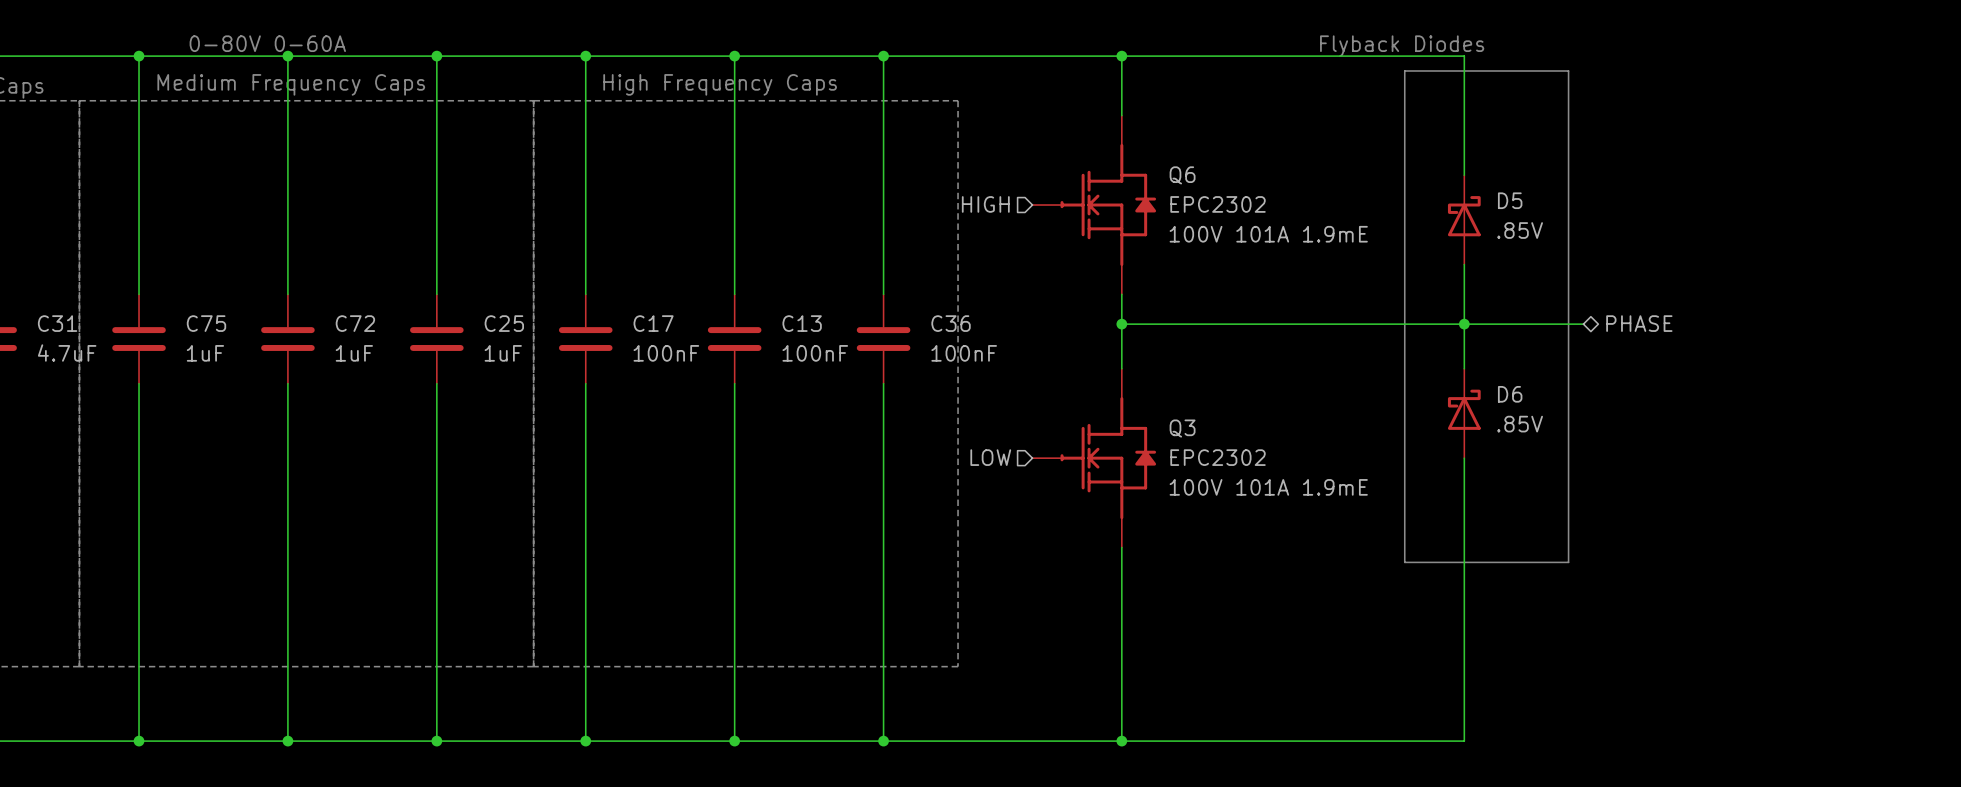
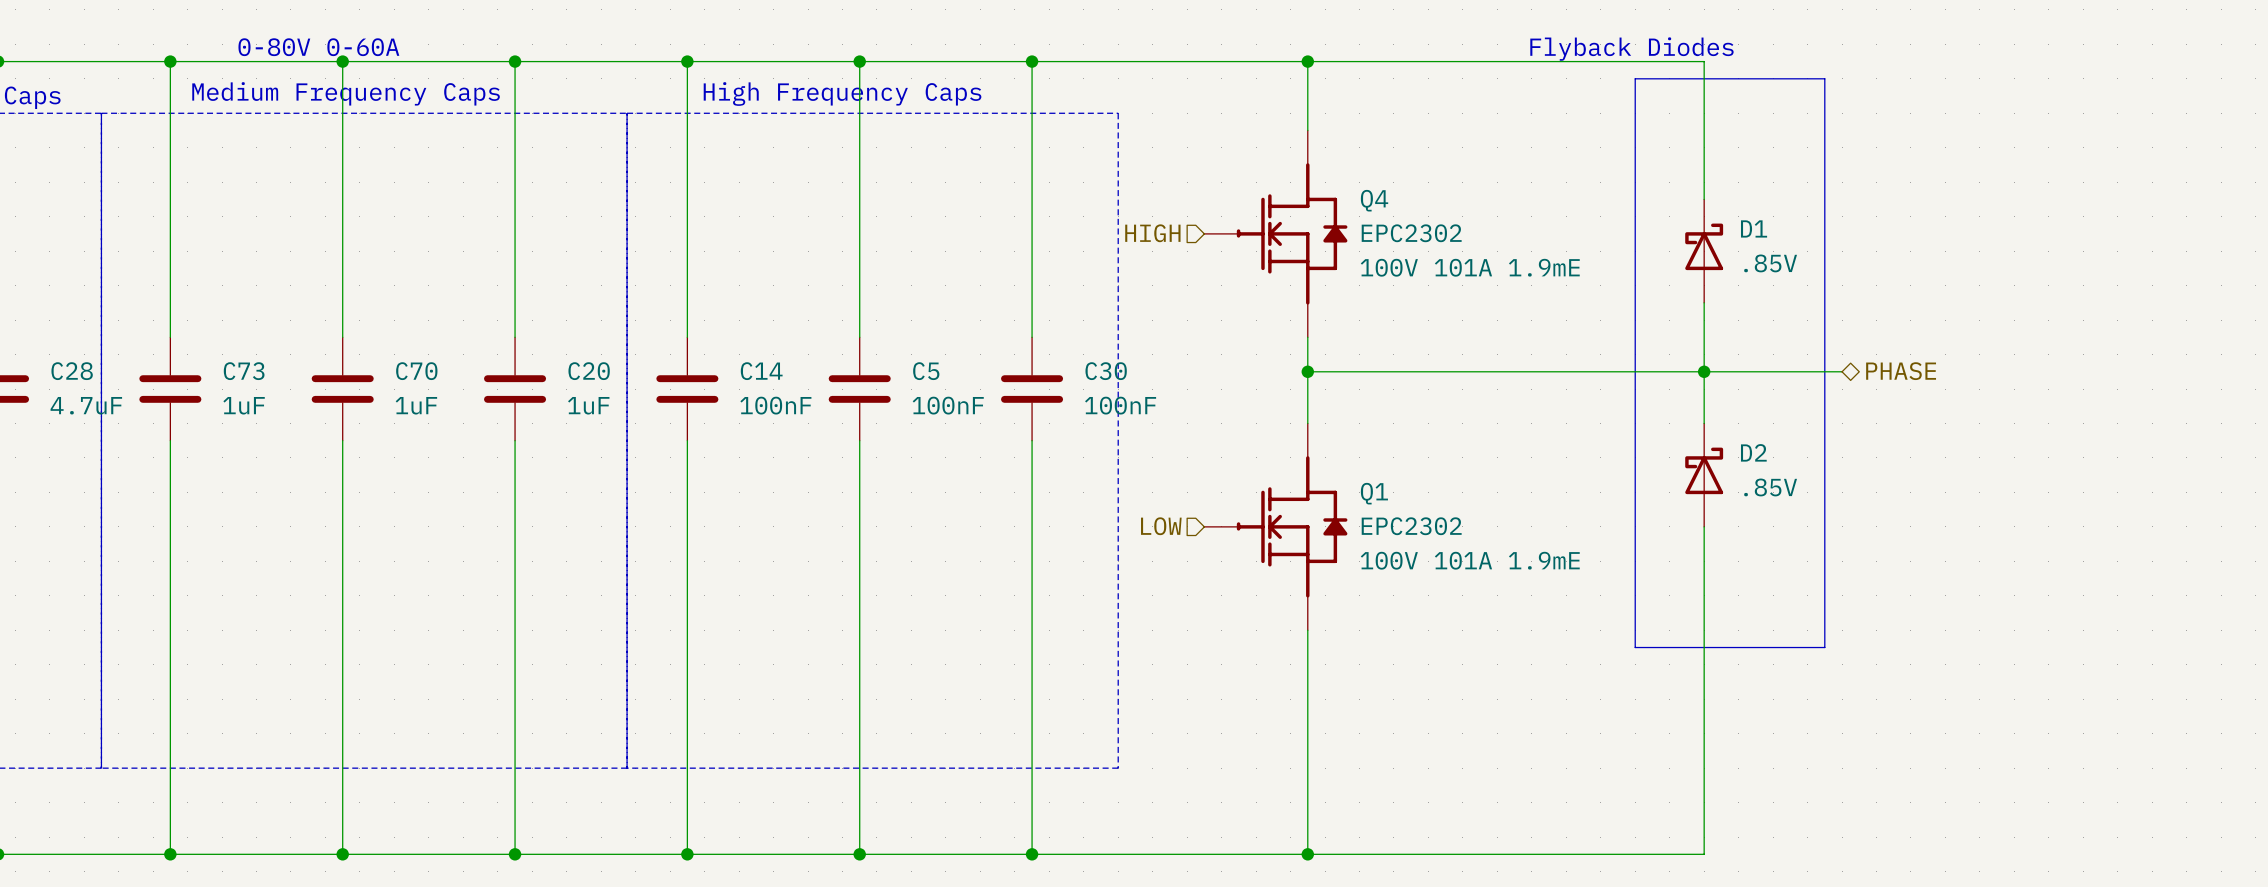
Q6 name: Q6 (1182, 175) -> Q4 (1374, 200)
D5 name: D5 (1510, 200) -> D1 (1754, 228)
C31 name: C31 (57, 323) -> C28 (72, 371)
C75 name: C75 (206, 323) -> C73 (244, 371)
C72 name: C72 (355, 323) -> C70 (416, 371)
C25 name: C25 (504, 323) -> C20 (589, 371)
C17 name: C17 (653, 323) -> C14 (761, 371)
C13 name: C13 (802, 323) -> C5 (926, 371)
C36 name: C36 (951, 323) -> C30 (1106, 371)
D6 name: D6 (1510, 394) -> D2 (1753, 452)
Q3 name: Q3 (1182, 428) -> Q1 (1374, 493)

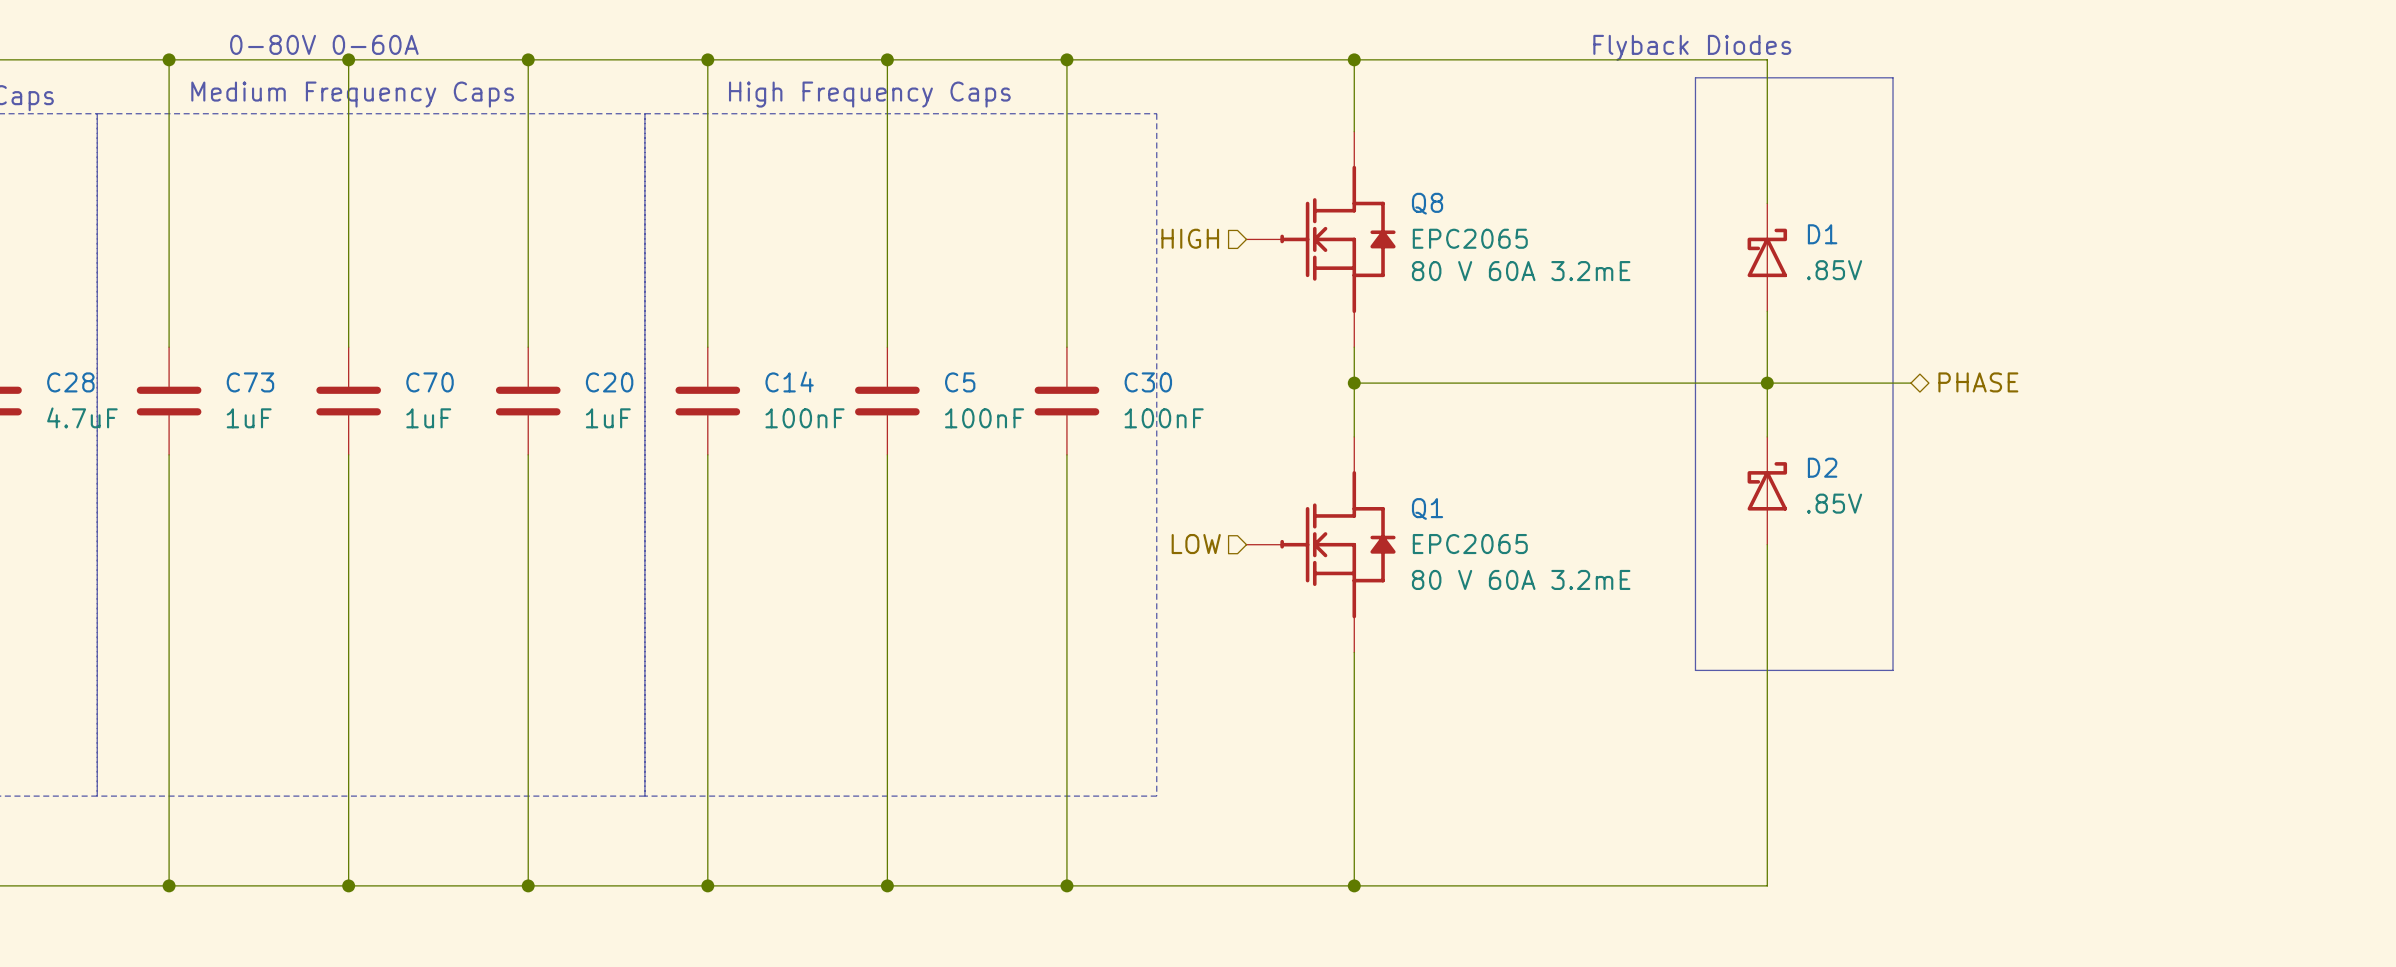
Q4 name: Q4 (1374, 200) -> Q8 (1427, 203)
Q4 value: EPC2302 (1411, 233) -> EPC2065 (1470, 238)
Q4 text: 100V 101A 1.9mE (1470, 267) -> 80 V 60A 3.2mE (1521, 271)
Q1 value: EPC2302 (1411, 526) -> EPC2065 (1470, 544)
Q1 text: 100V 101A 1.9mE (1470, 560) -> 80 V 60A 3.2mE (1521, 579)

